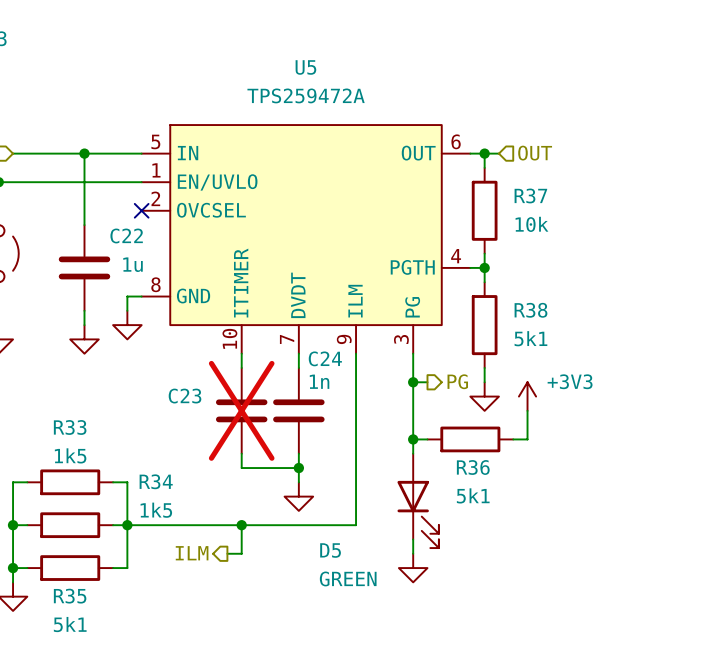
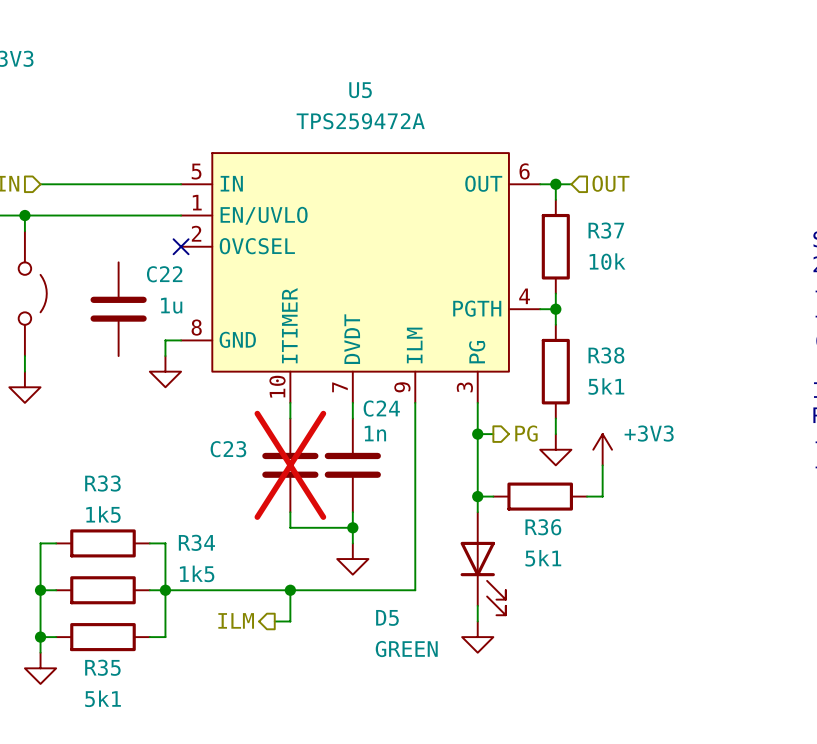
wire: (84, 153) (84, 225) -> none
junction: (84, 153) -> none
wire: (84, 310) (84, 325) -> none
power symbol: (84, 339) -> none

